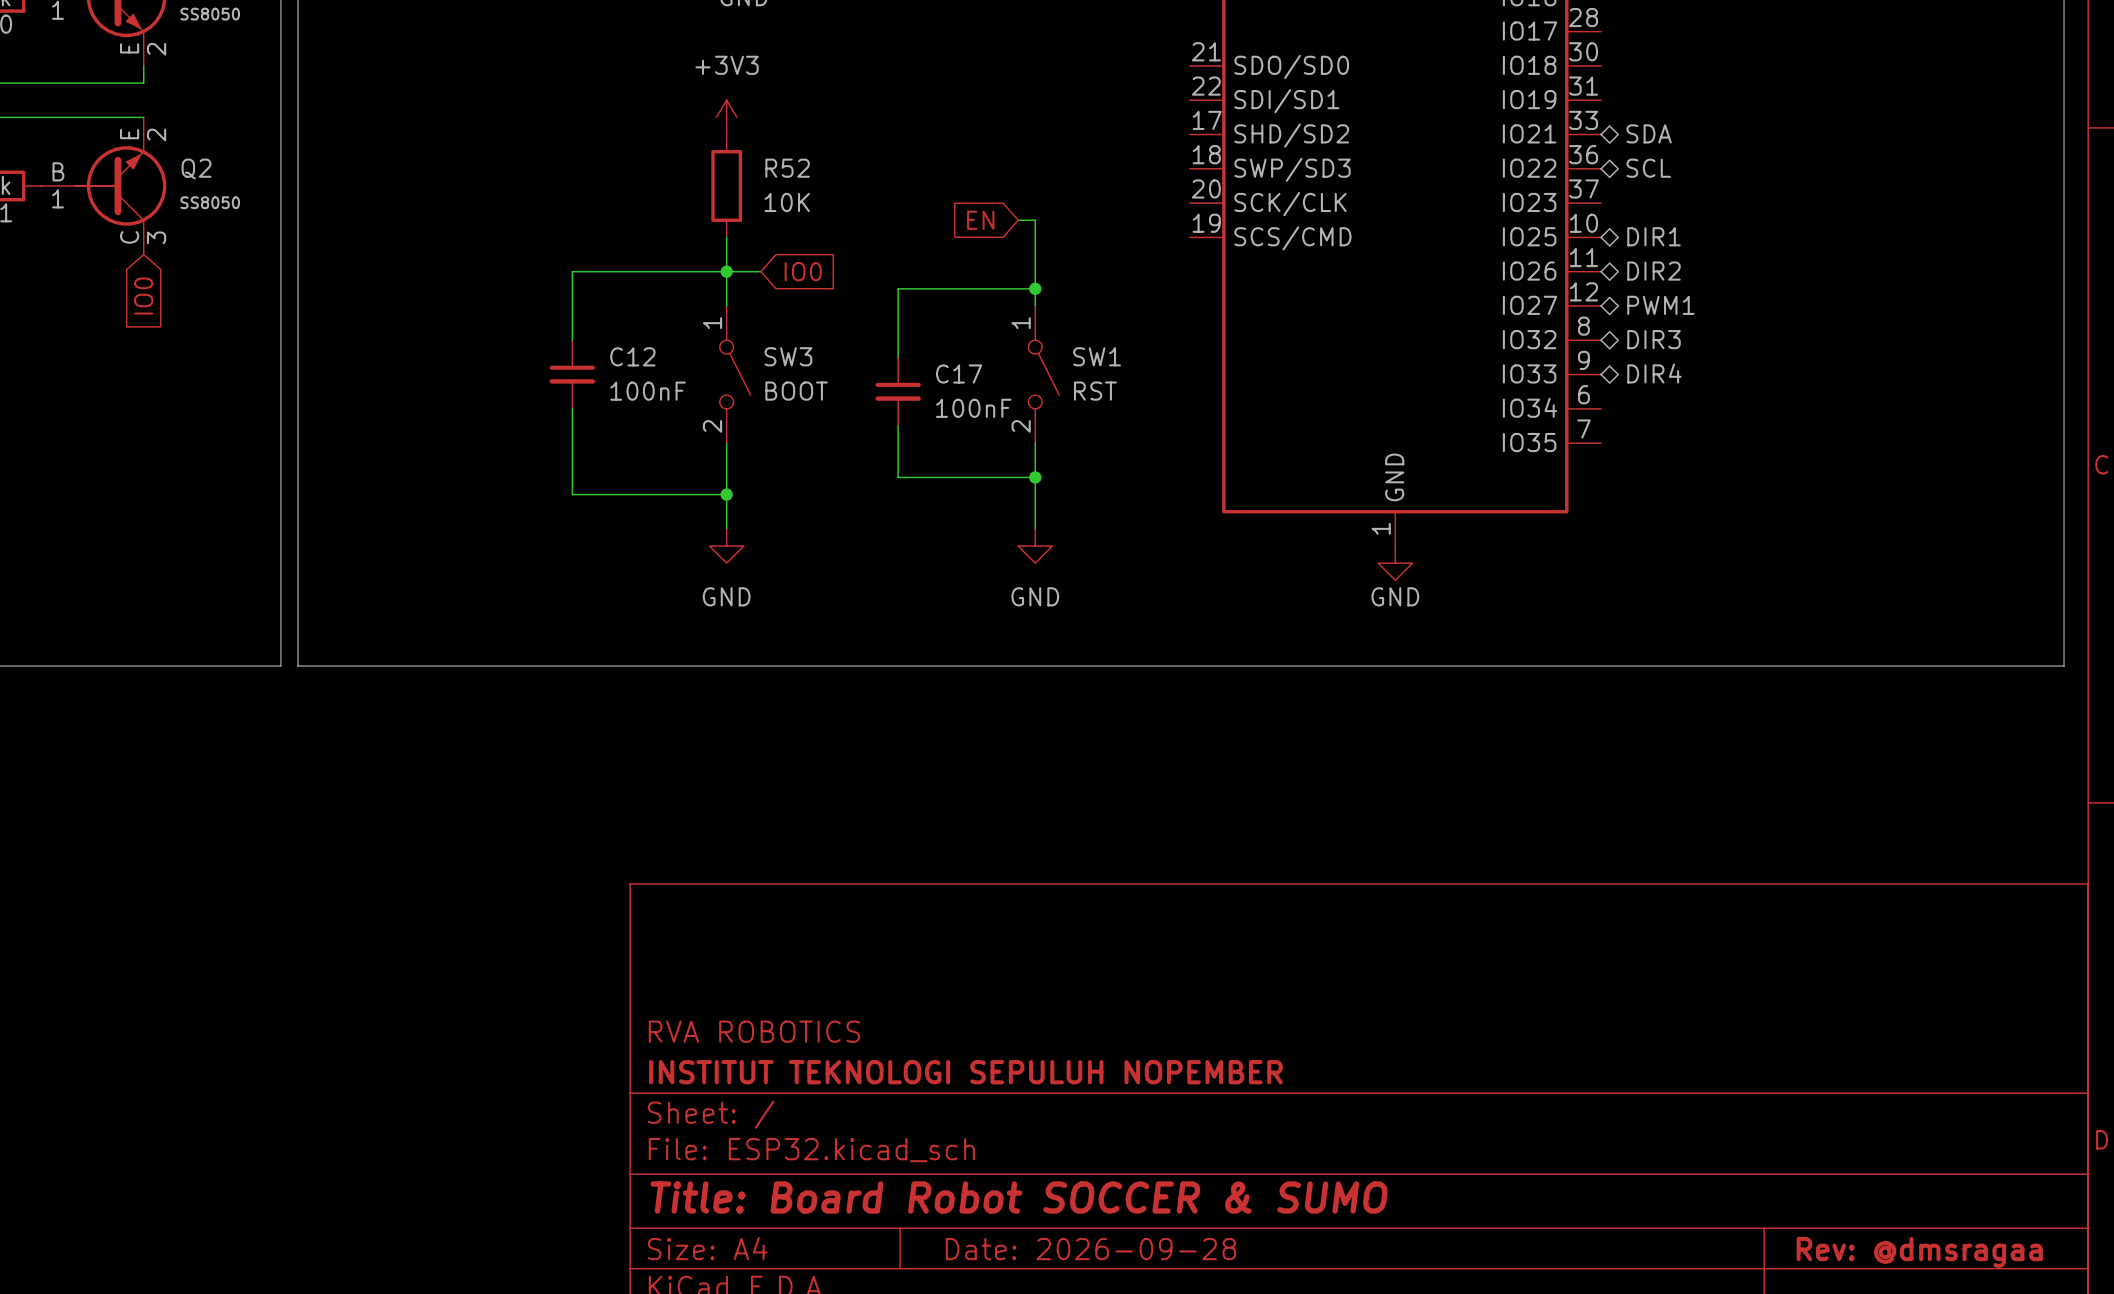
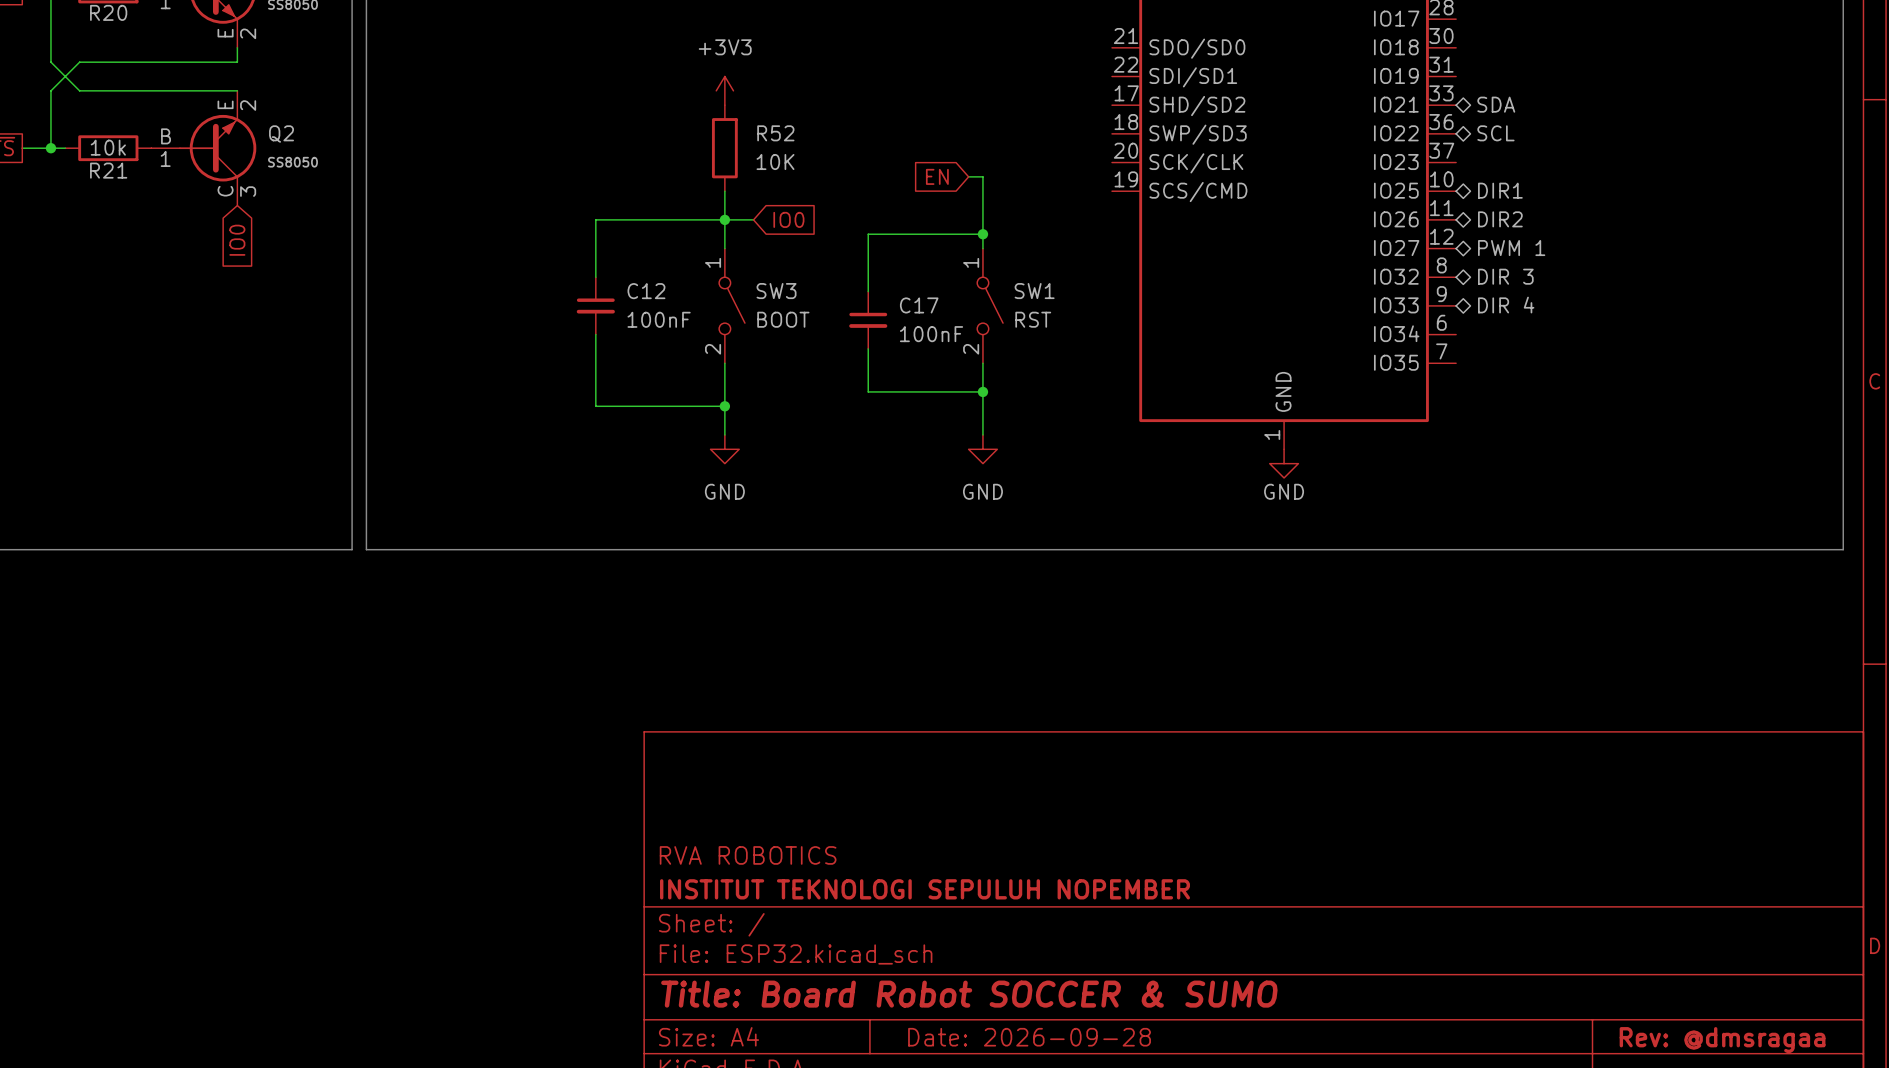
hierarchical label: PWM1 (1660, 305) -> PWM 1 (1511, 248)
hierarchical label: DIR3 (1654, 339) -> DIR 3 (1505, 276)
hierarchical label: DIR4 (1654, 373) -> DIR 4 (1506, 305)

